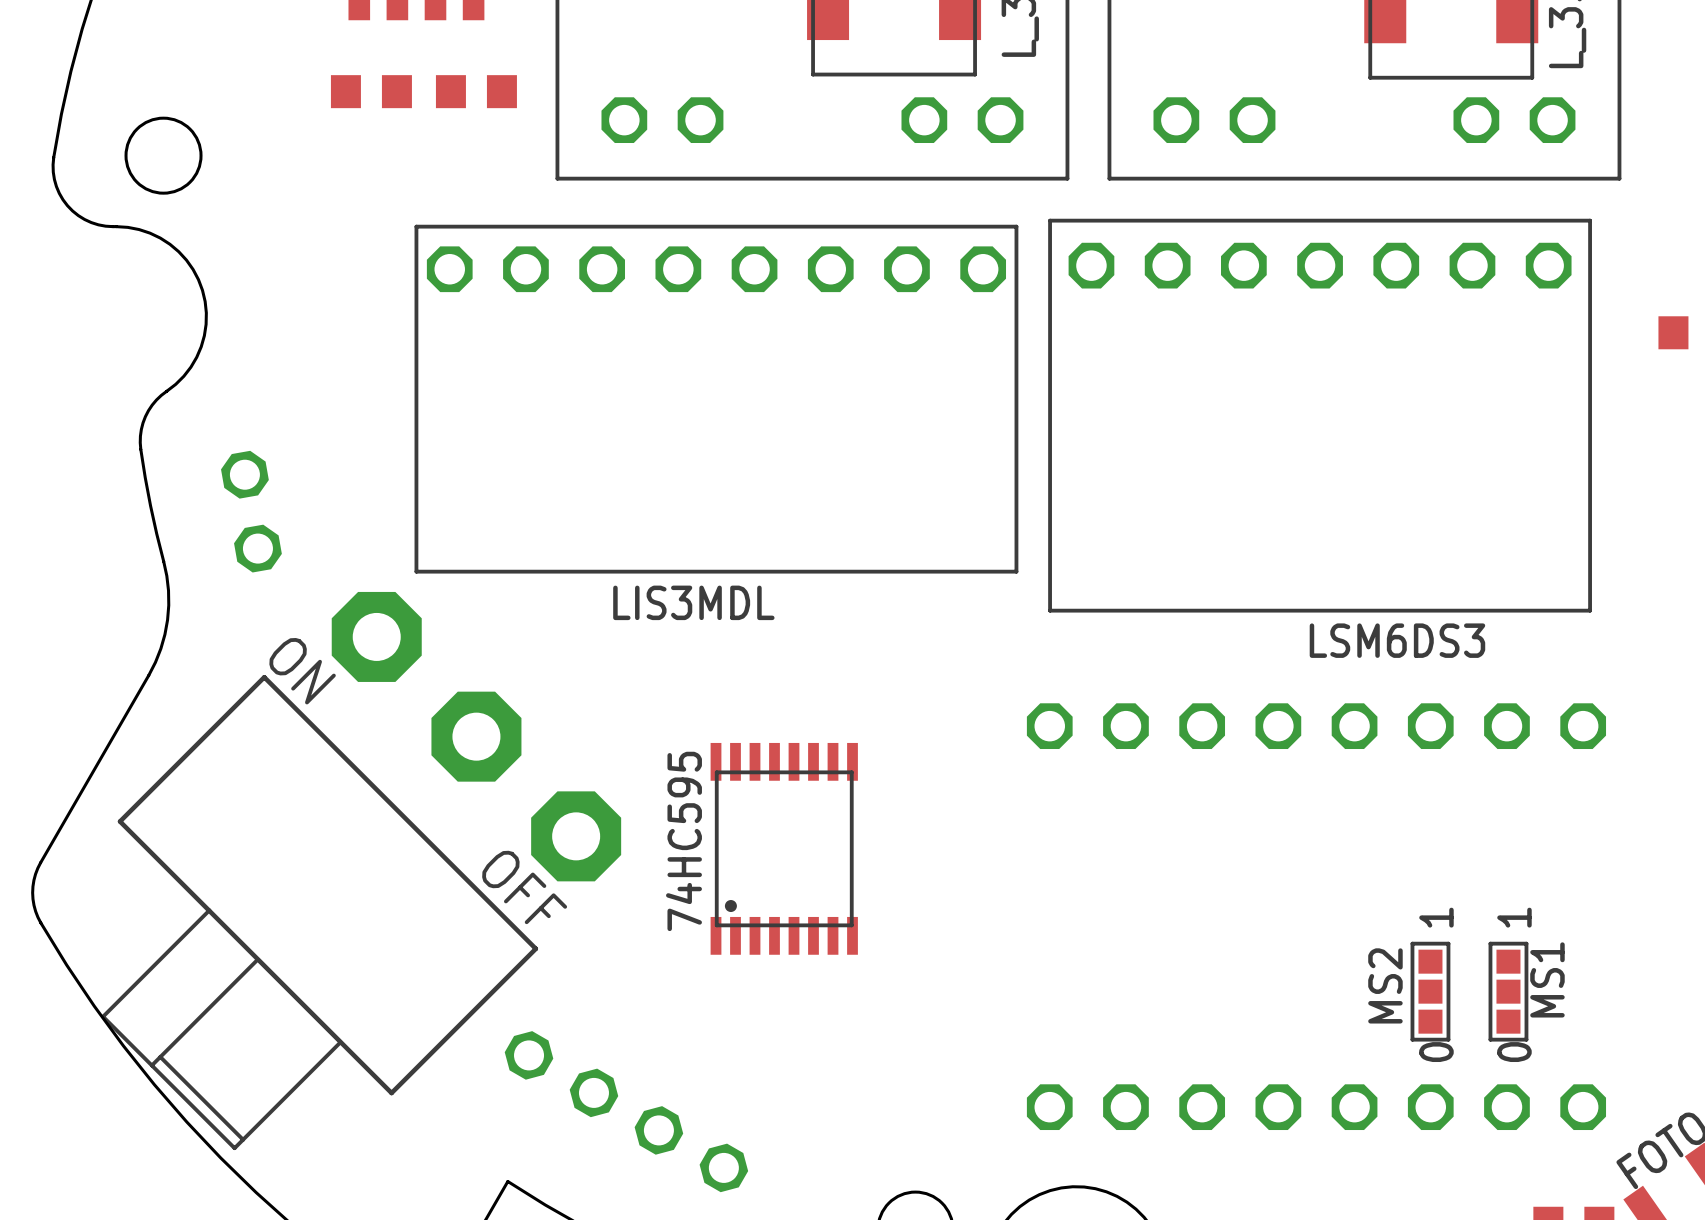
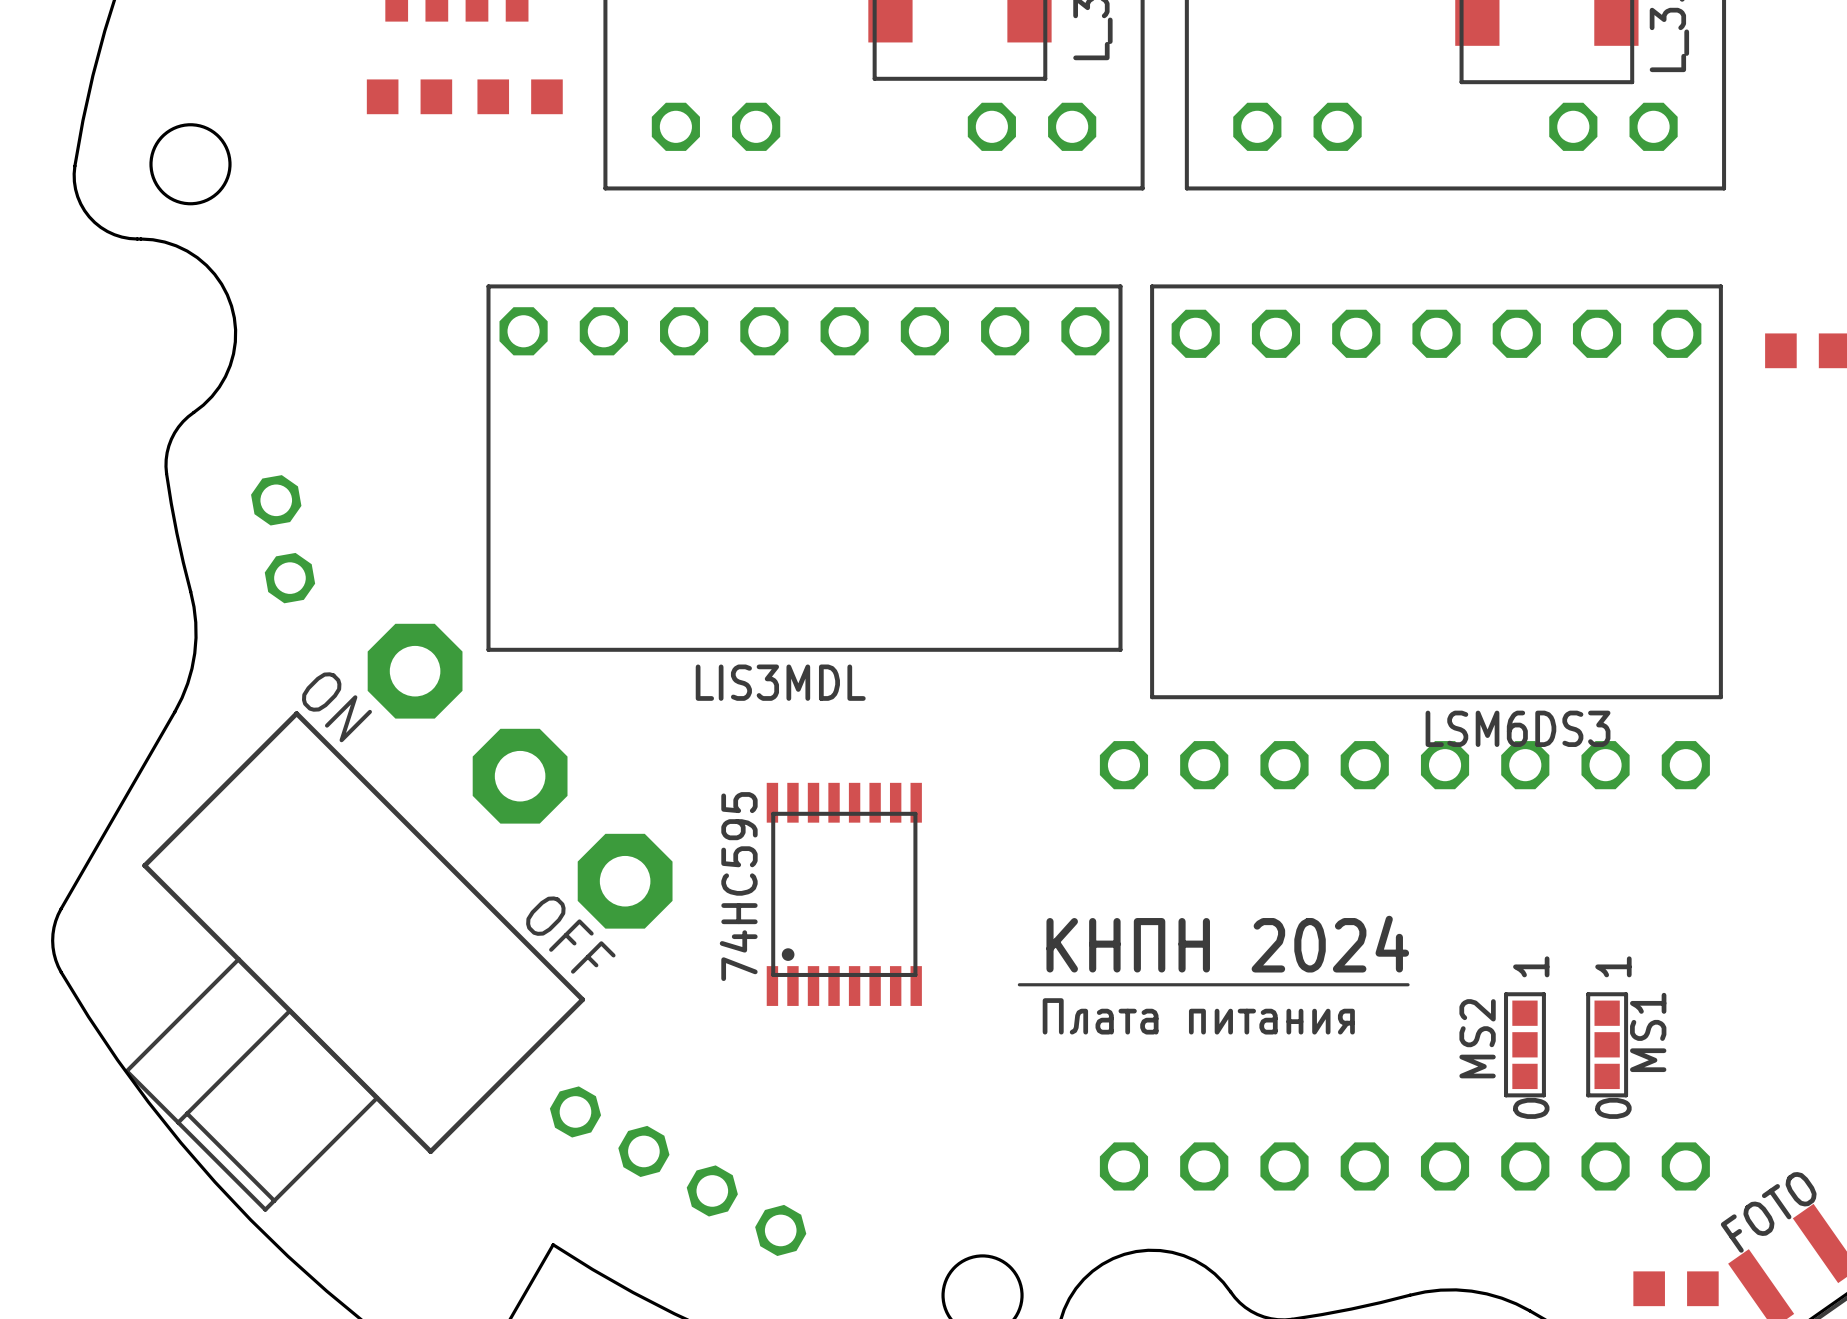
LIS3MDL position: (716, 399) -> (804, 468)
LSM6DS3 position: (1320, 415) -> (1436, 491)
drawing: none -> [1017, 983, 1410, 987]

